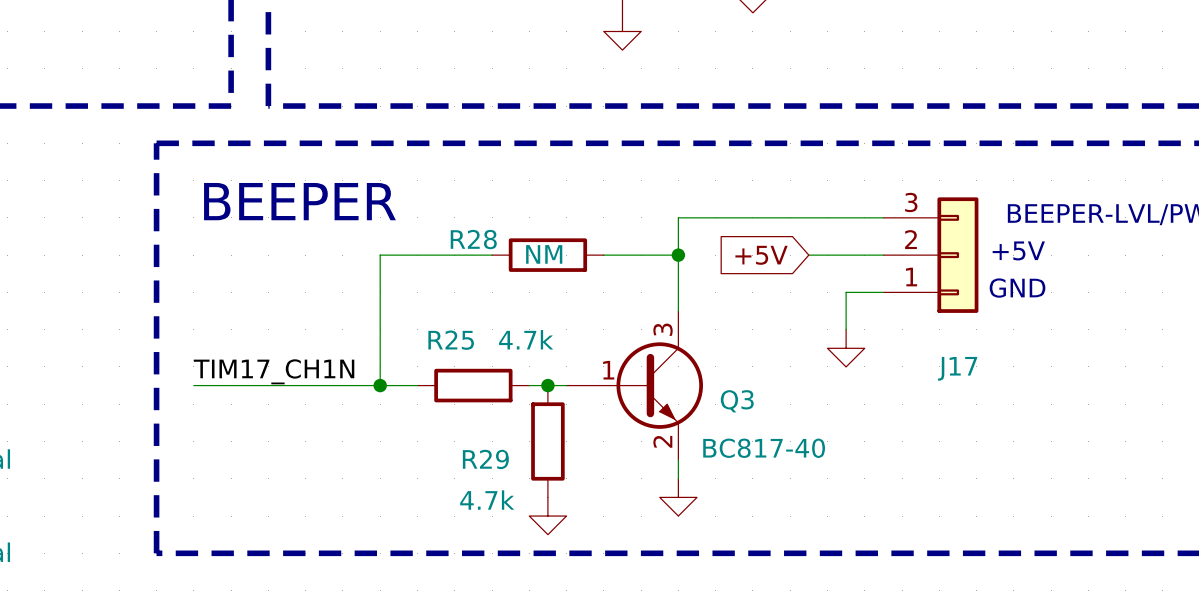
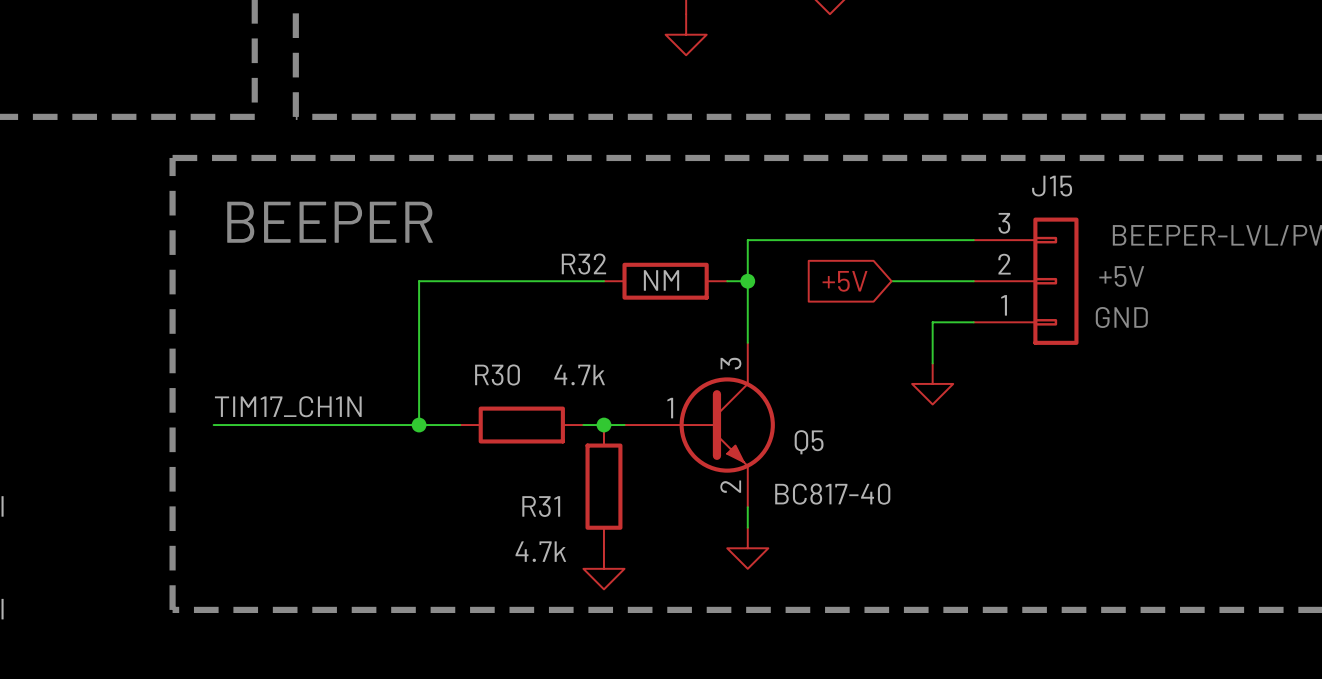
R28: NM (547, 255) -> none
wire: (603, 255) (659, 255) -> (542, 281) (603, 281)
R32: none -> NM (665, 281)
R25 name: R25 (451, 340) -> R30 (497, 374)
J17 name: J17 (957, 368) -> J15 (1052, 186)
Q3 name: Q3 (737, 401) -> Q5 (809, 442)
R29 name: R29 (485, 459) -> R31 (541, 506)

